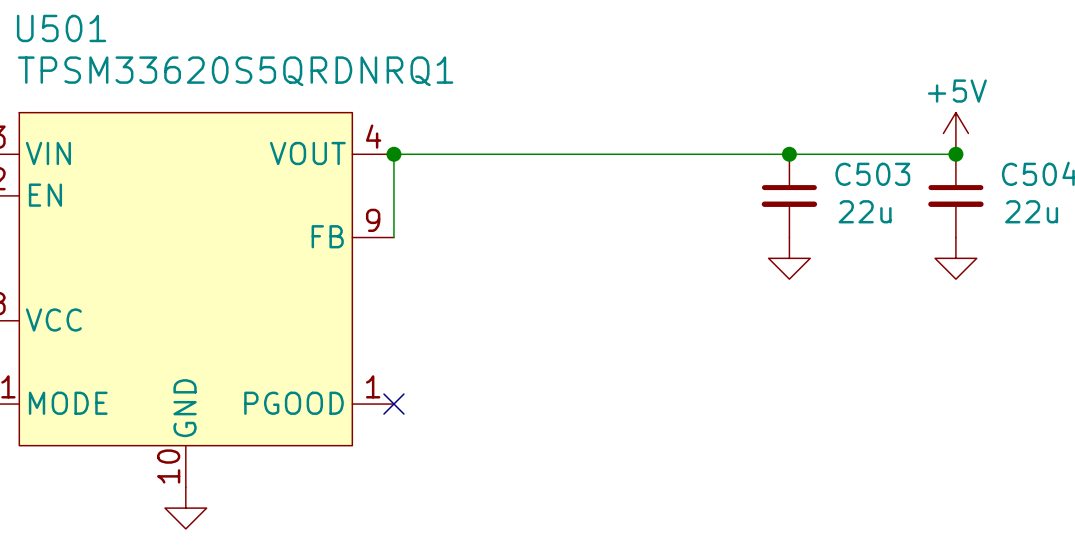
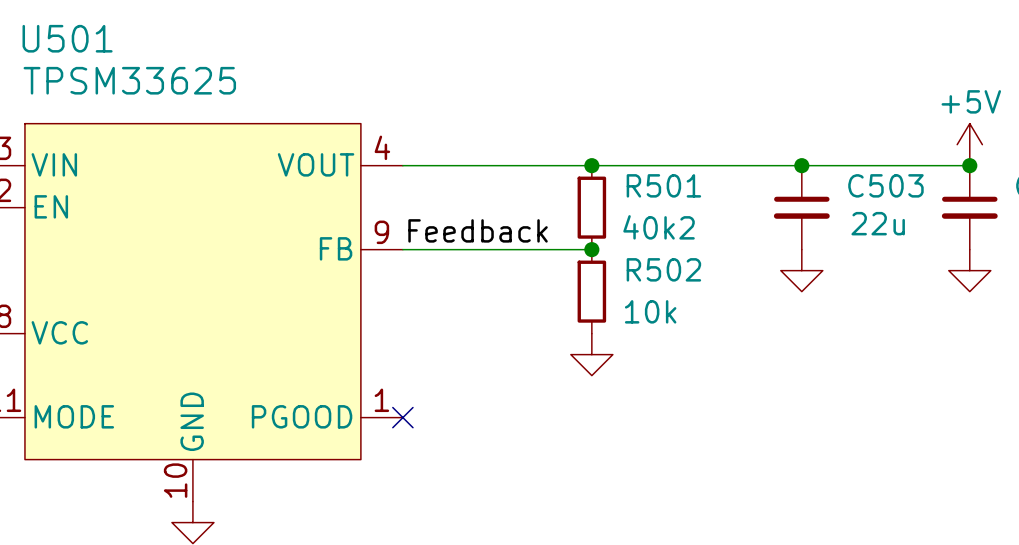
U501 value: TPSM33620S5QRDNRQ1 (235, 71) -> TPSM33625 (129, 80)
wire: (393, 154) (393, 237) -> (591, 249) (402, 249)
junction: (393, 154) -> none
junction: none -> (591, 165)
R501: none -> 40k2 (591, 207)
label: none -> Feedback (478, 230)
junction: none -> (591, 249)
R502: none -> 10k (591, 291)
power symbol: none -> (591, 354)

